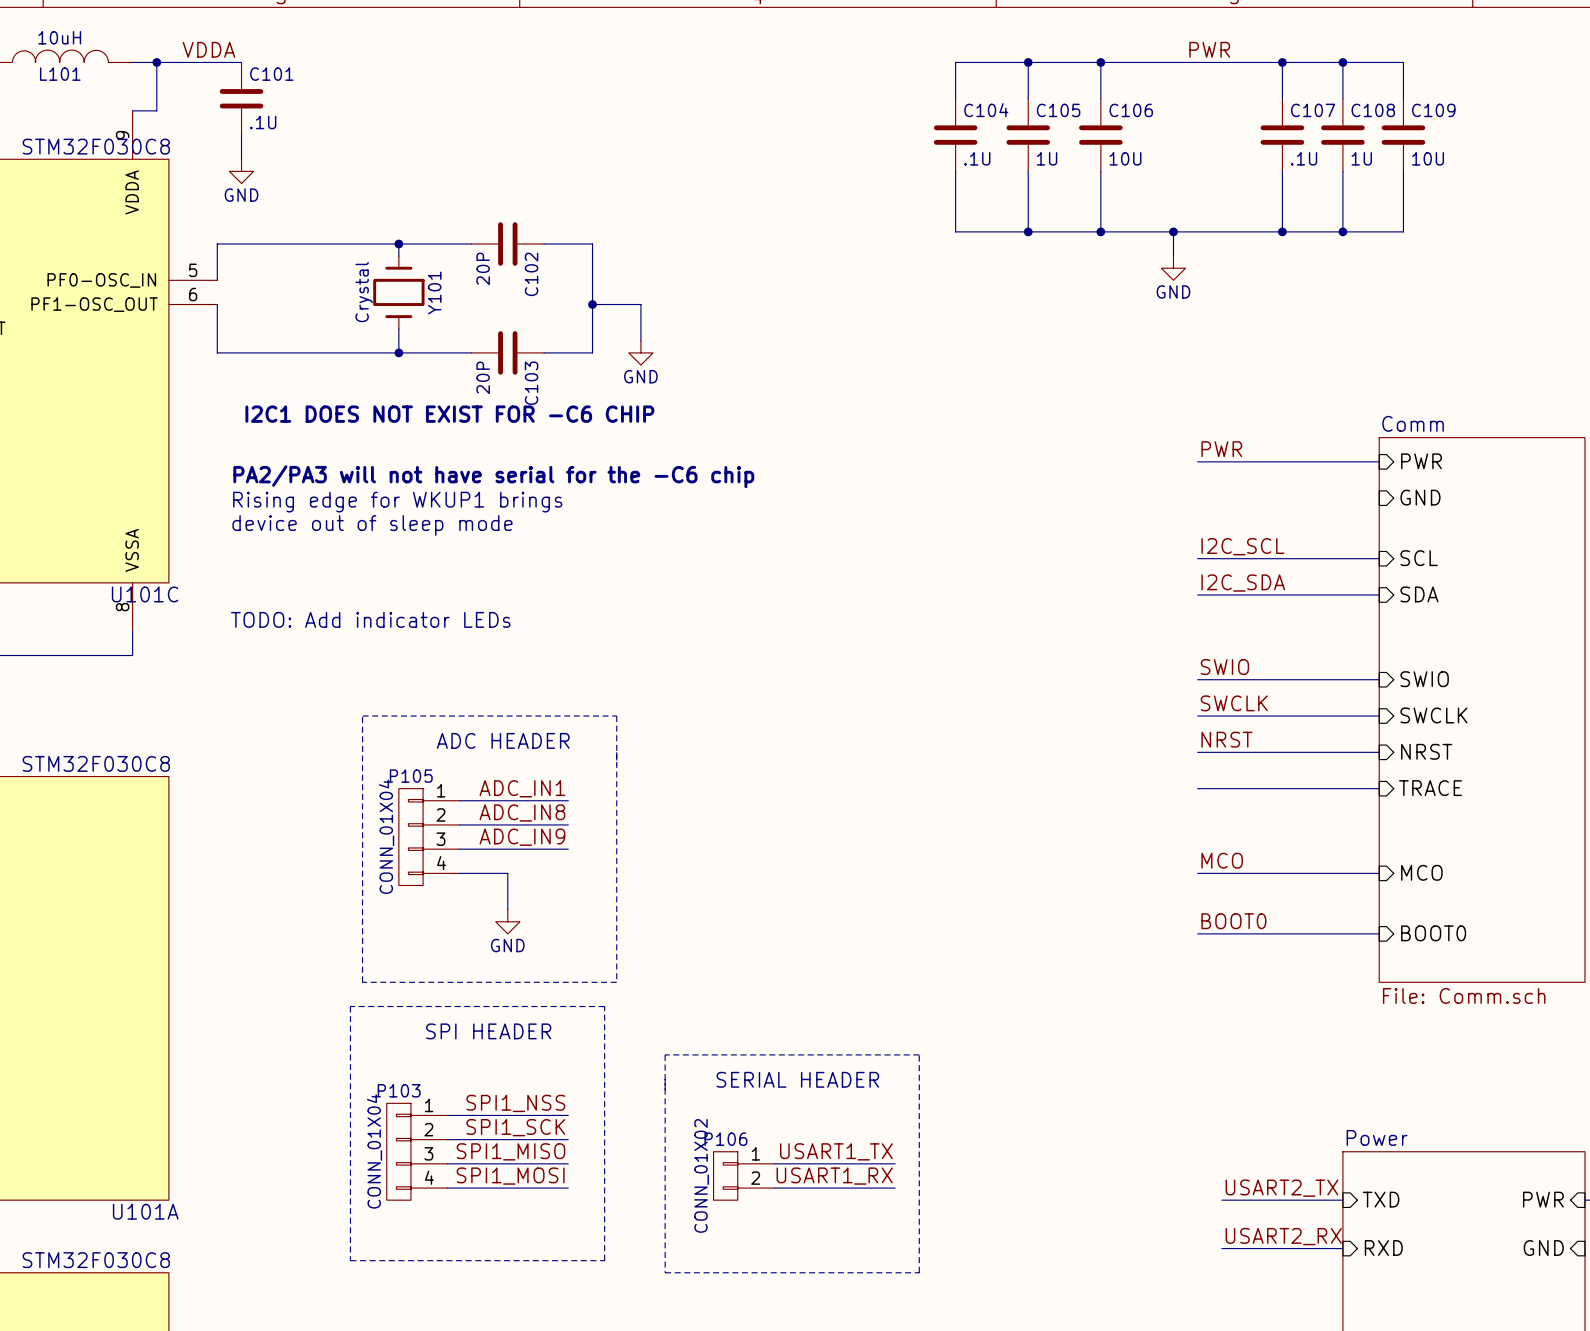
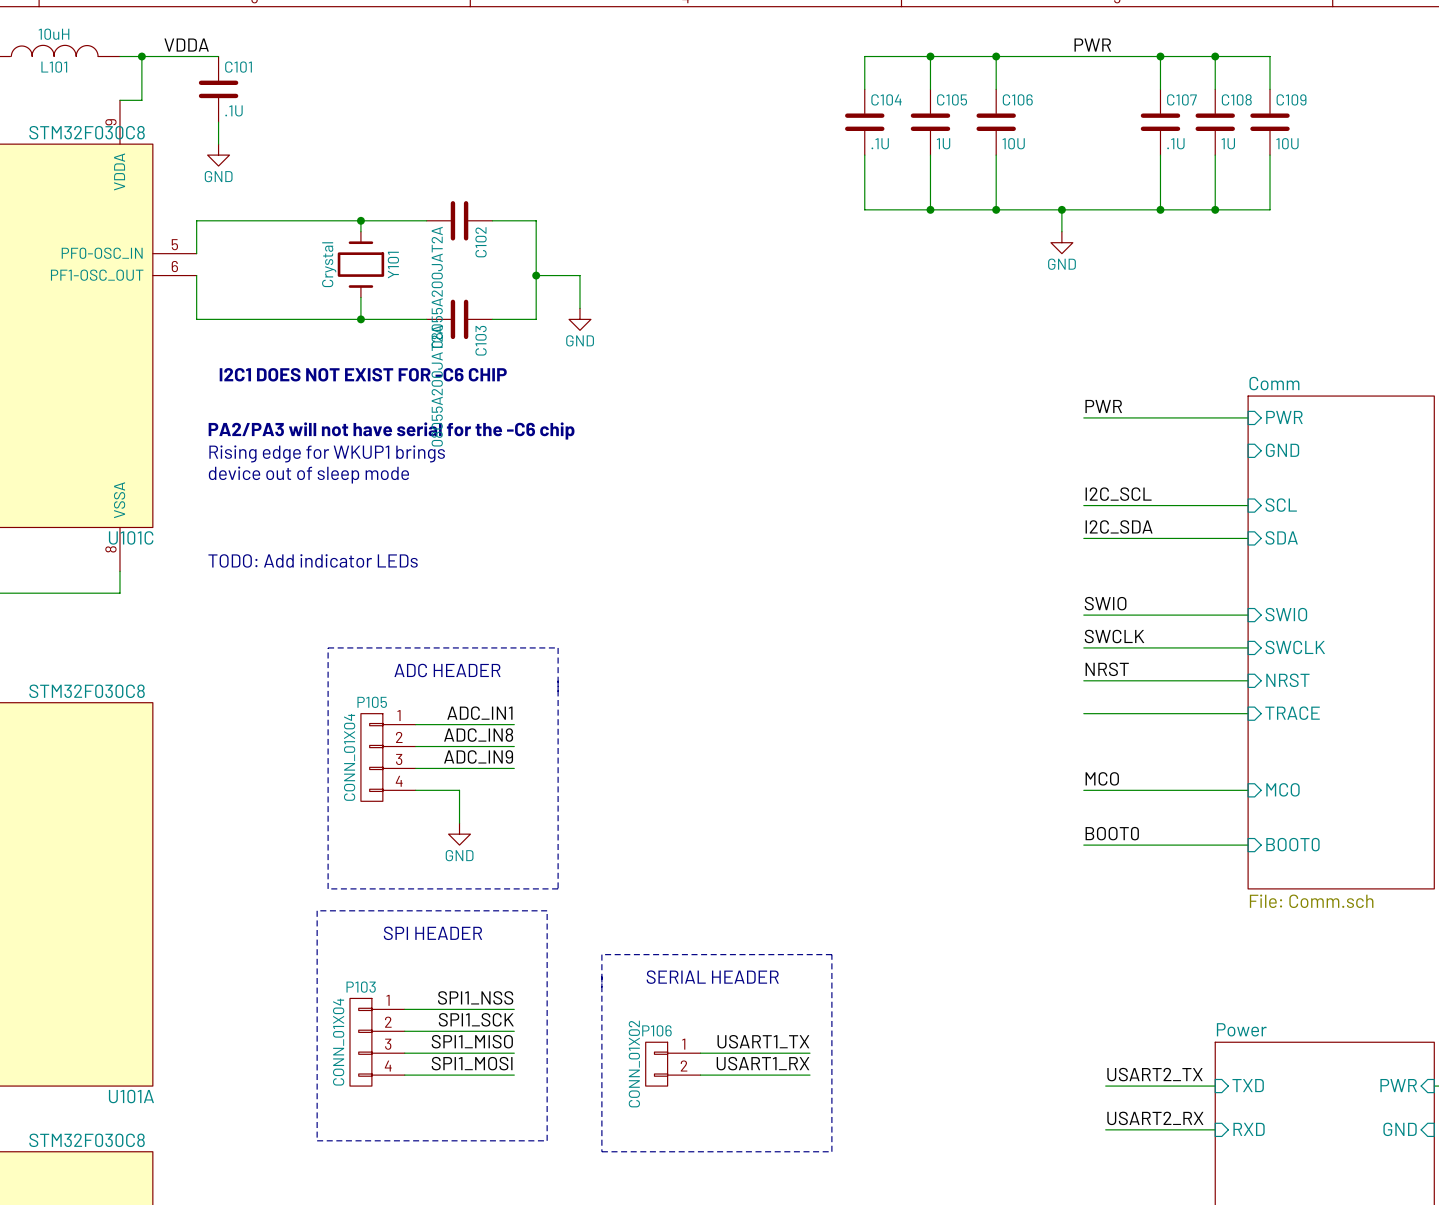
C102 value: 20P (483, 268) -> 08055A200JAT2A (437, 287)
C103 value: 20P (483, 377) -> 08055A200JAT2A (437, 385)

